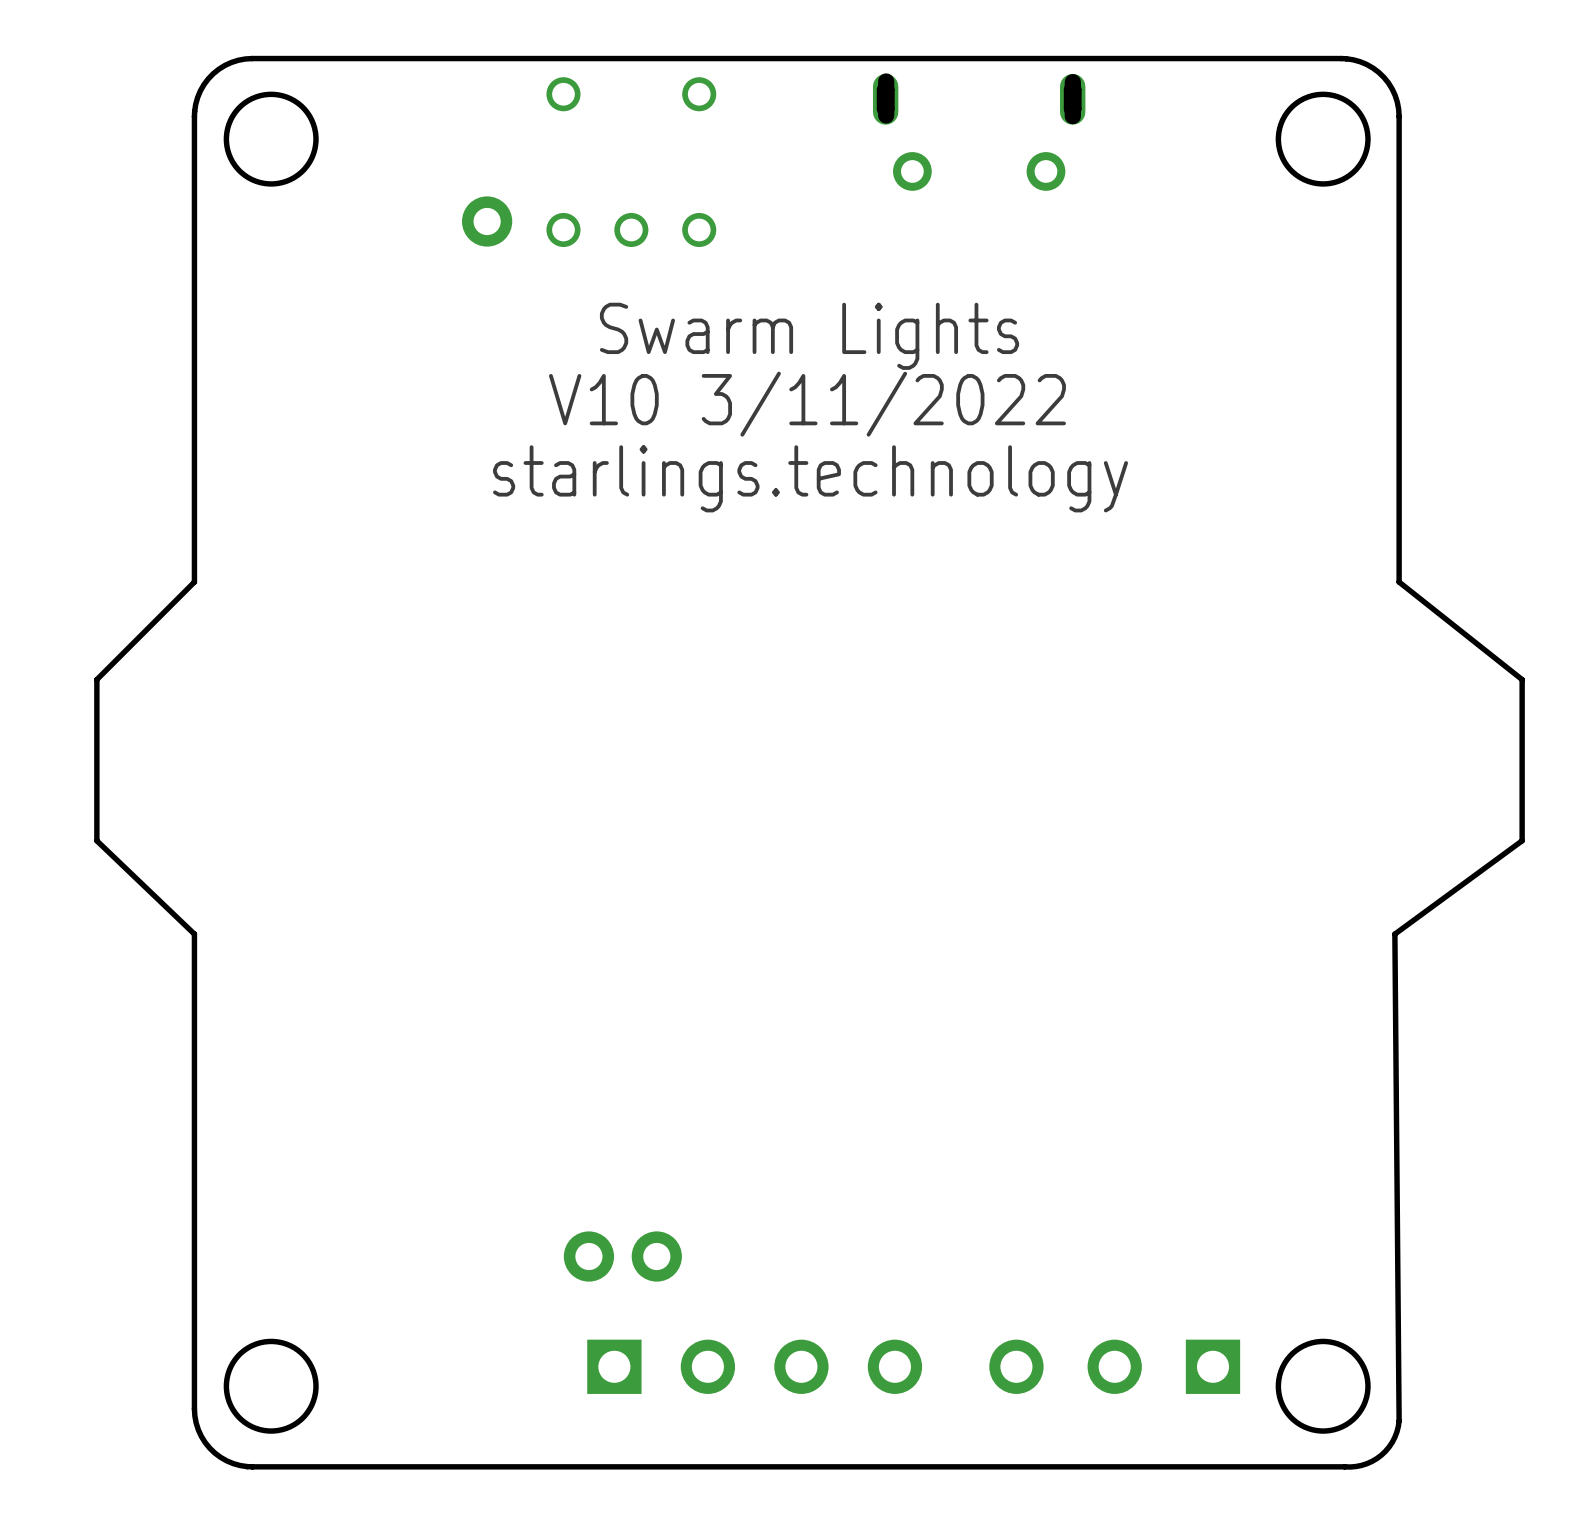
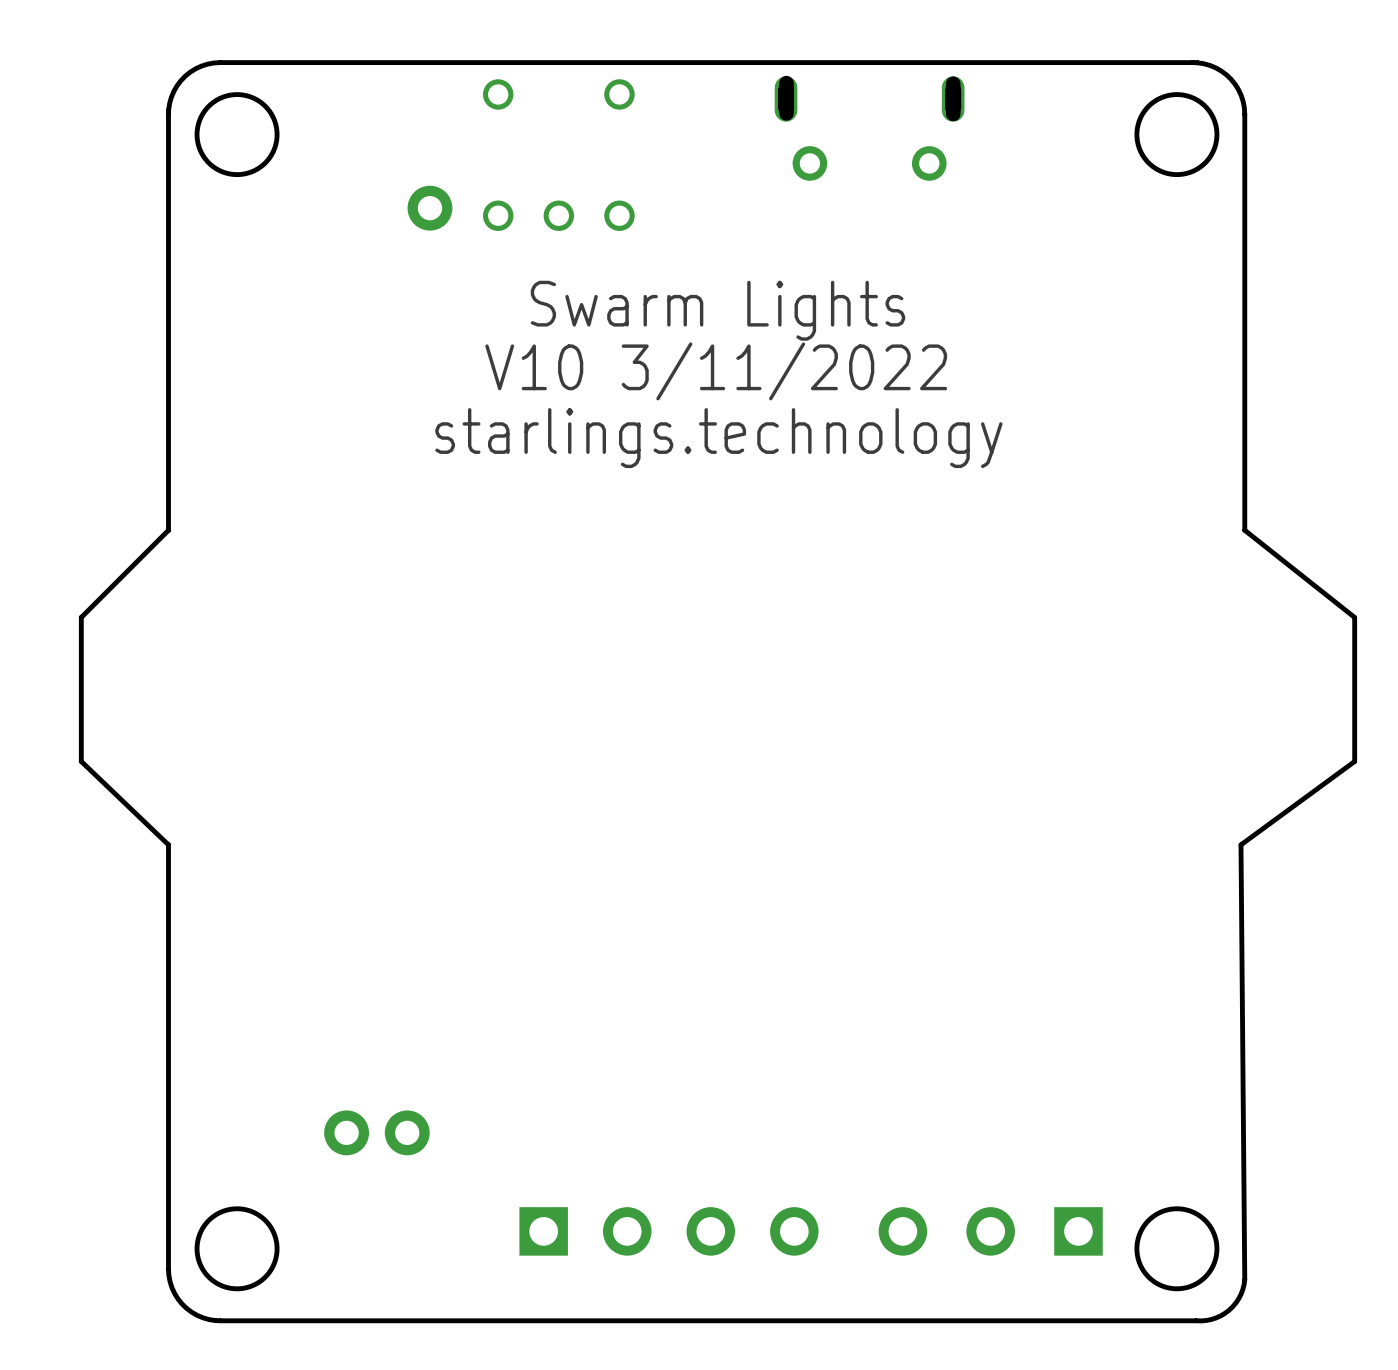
part position: (622, 1256) -> (376, 1132)

